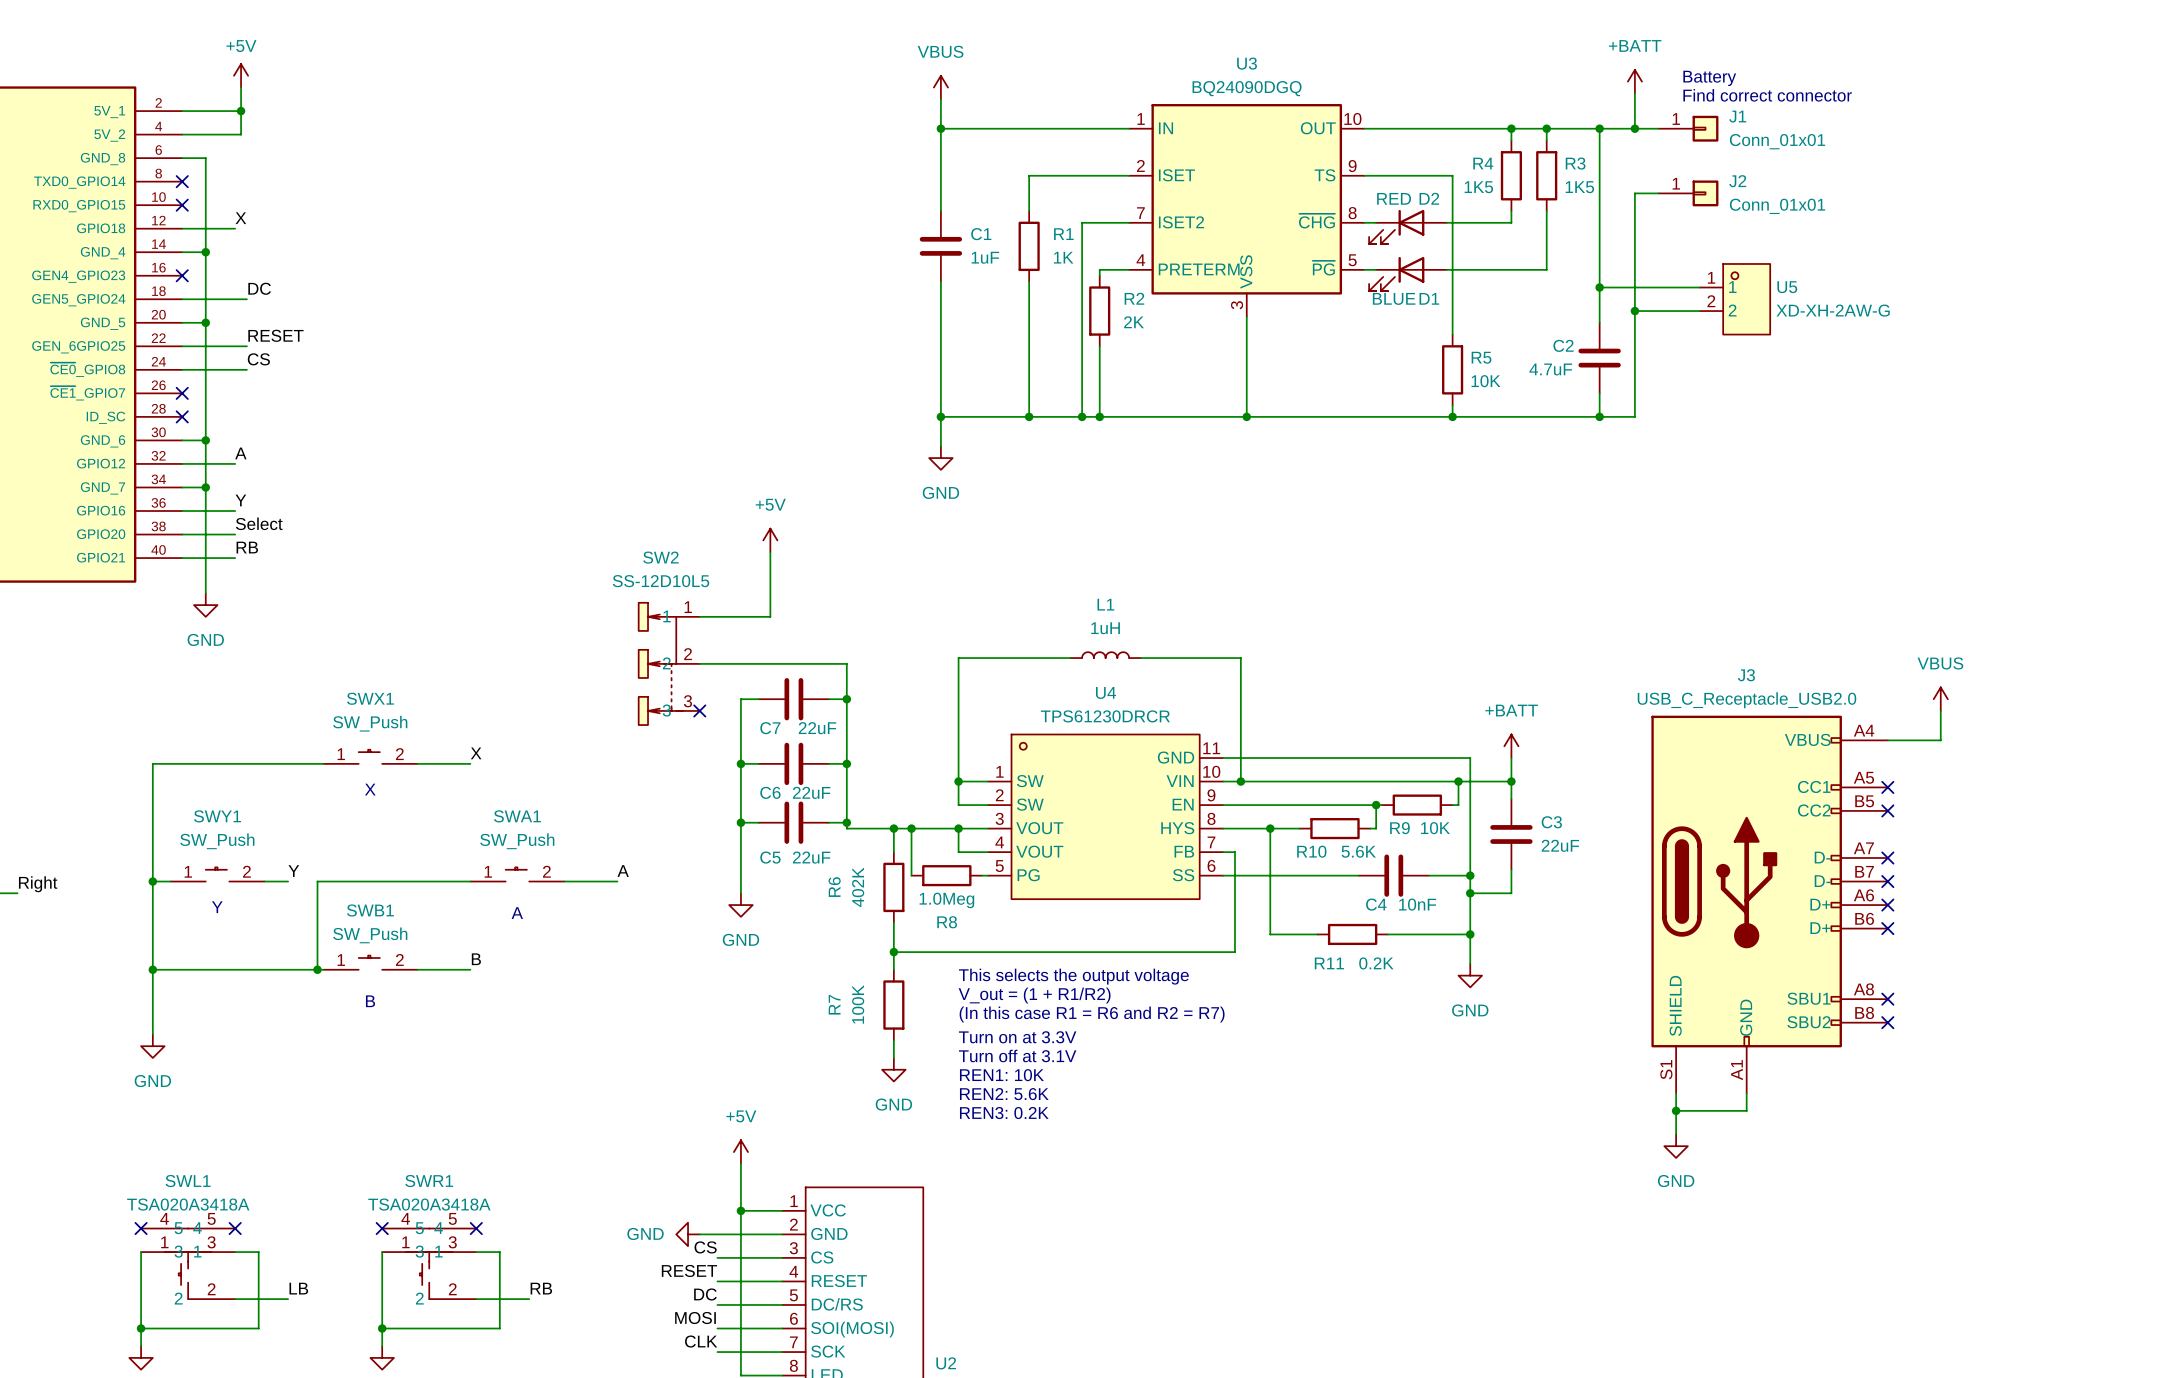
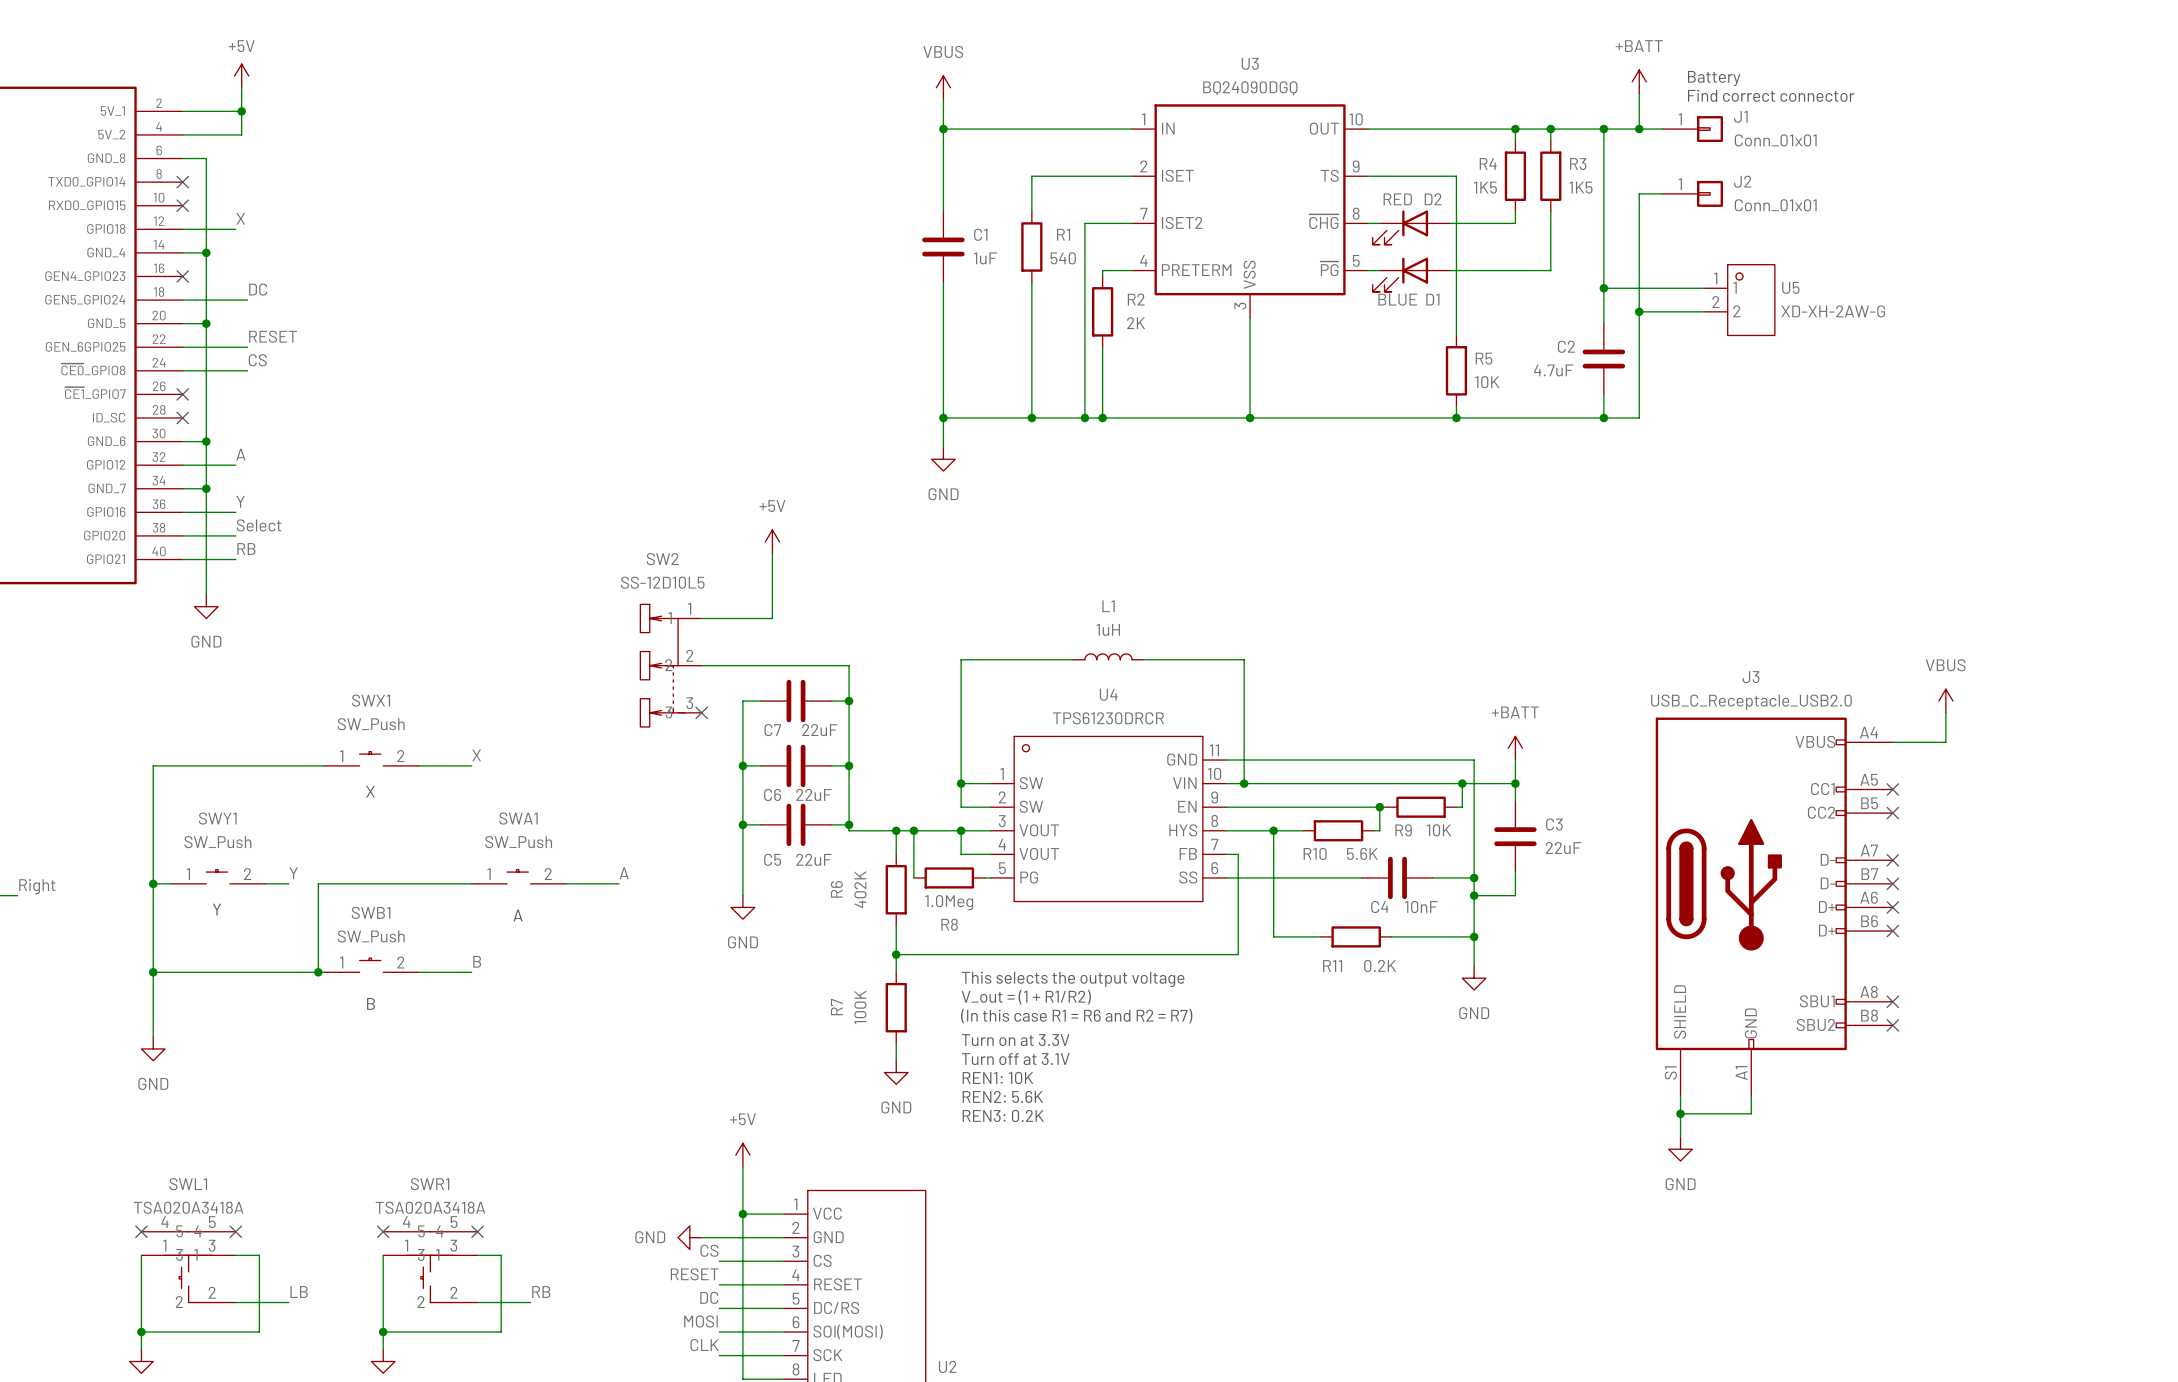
R1 value: 1K (1063, 257) -> 540 (1063, 258)

